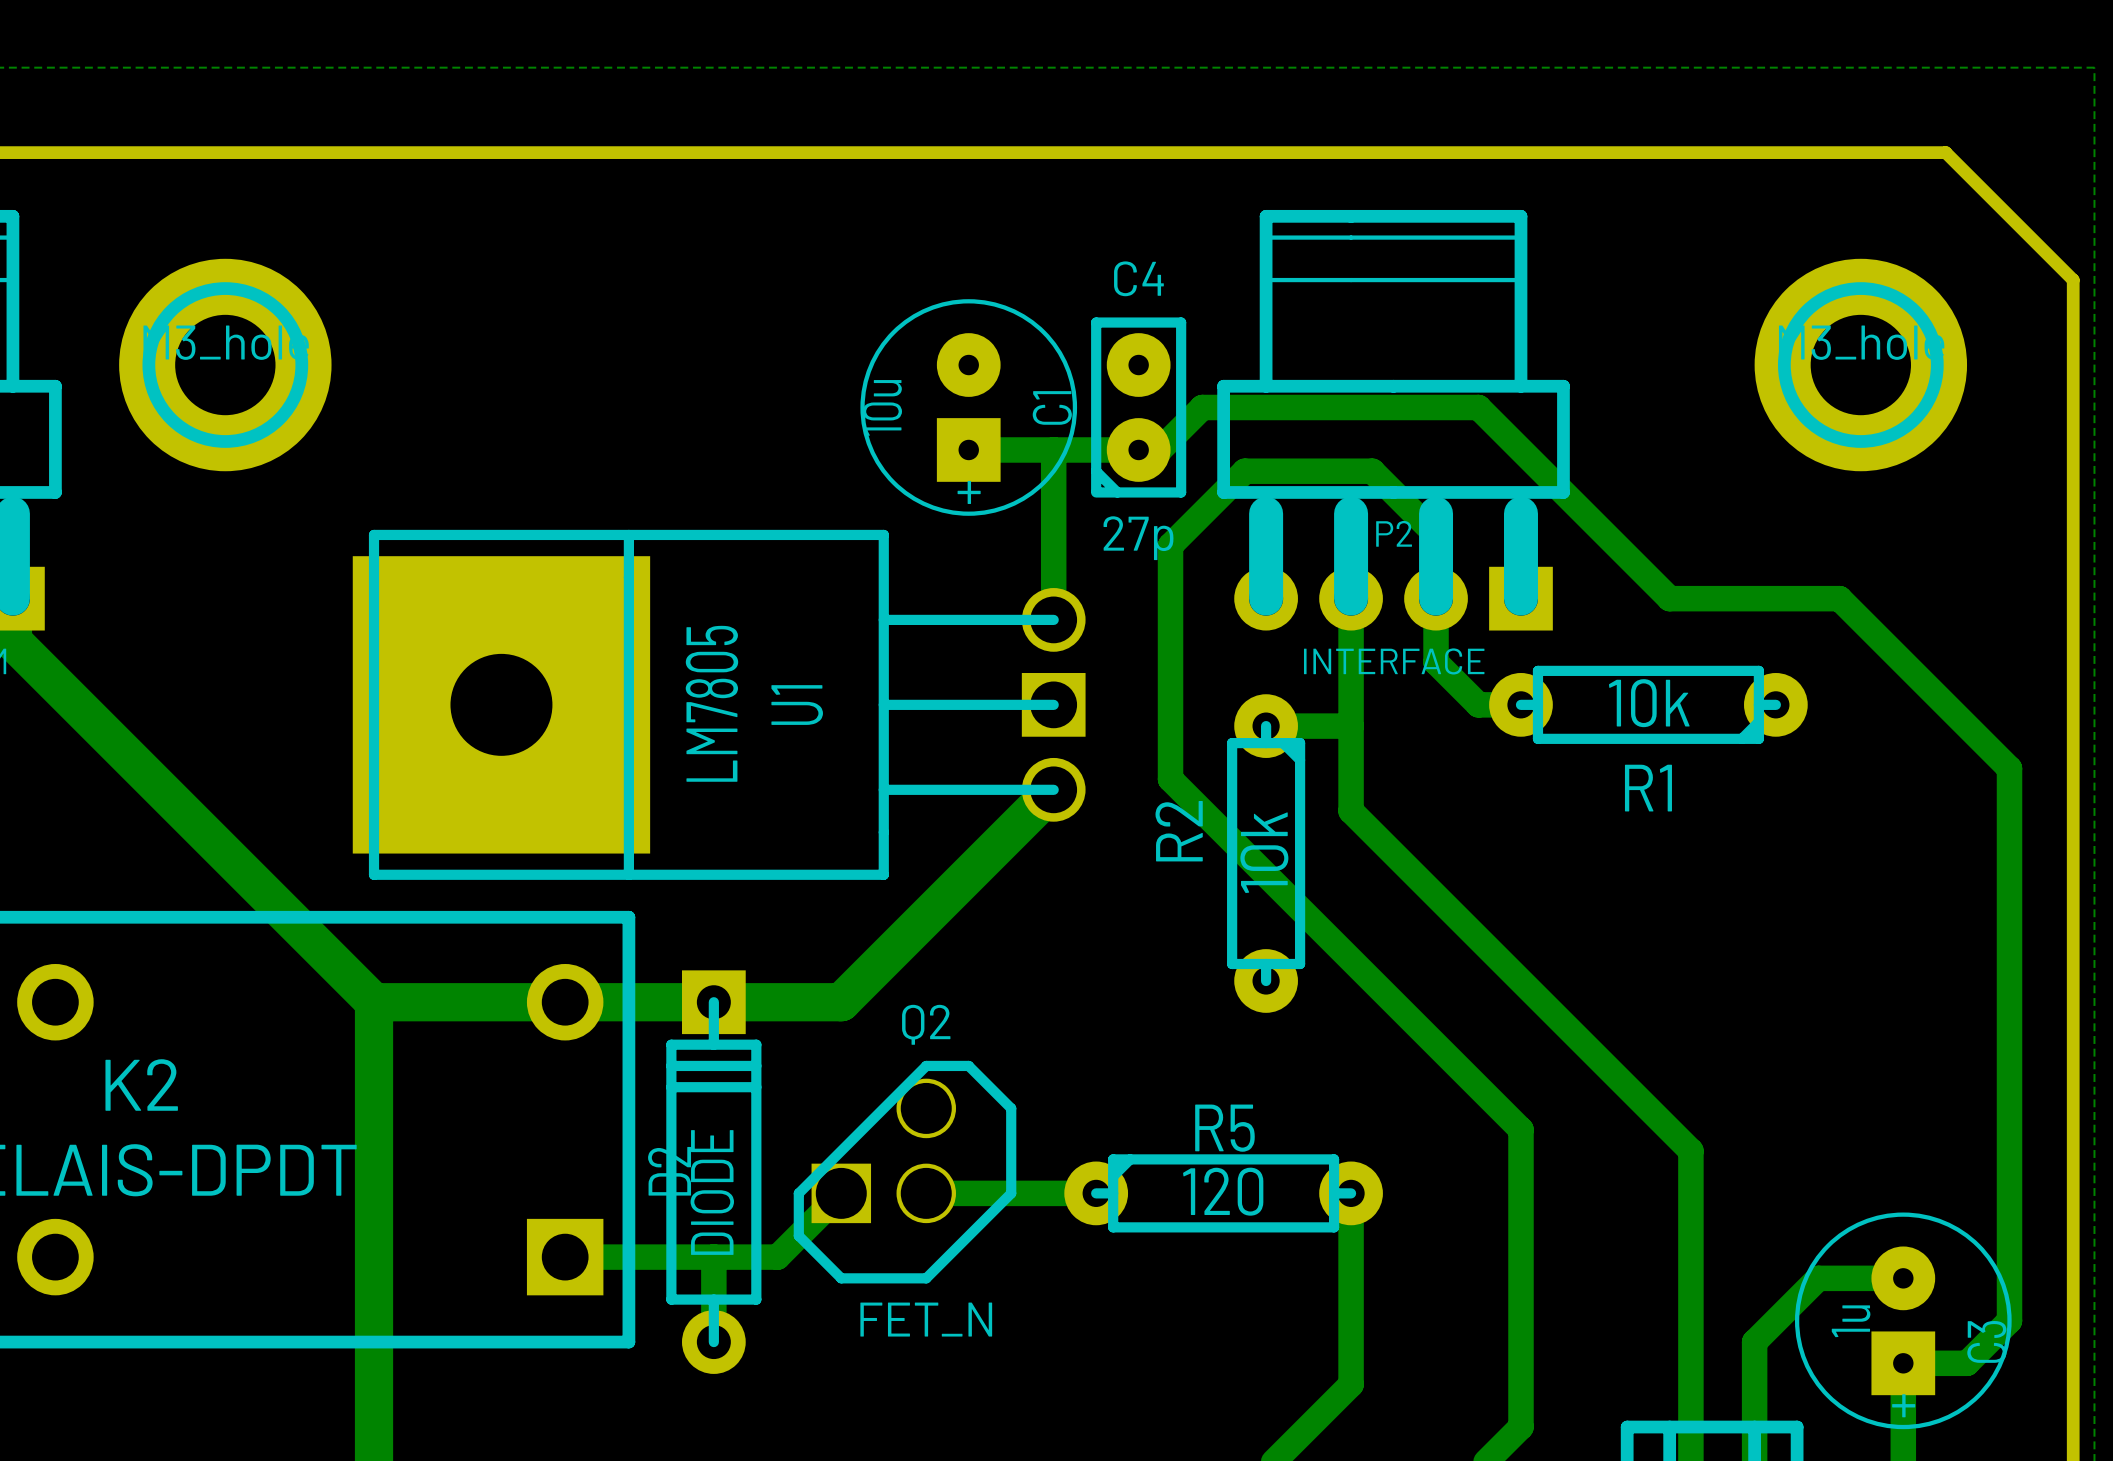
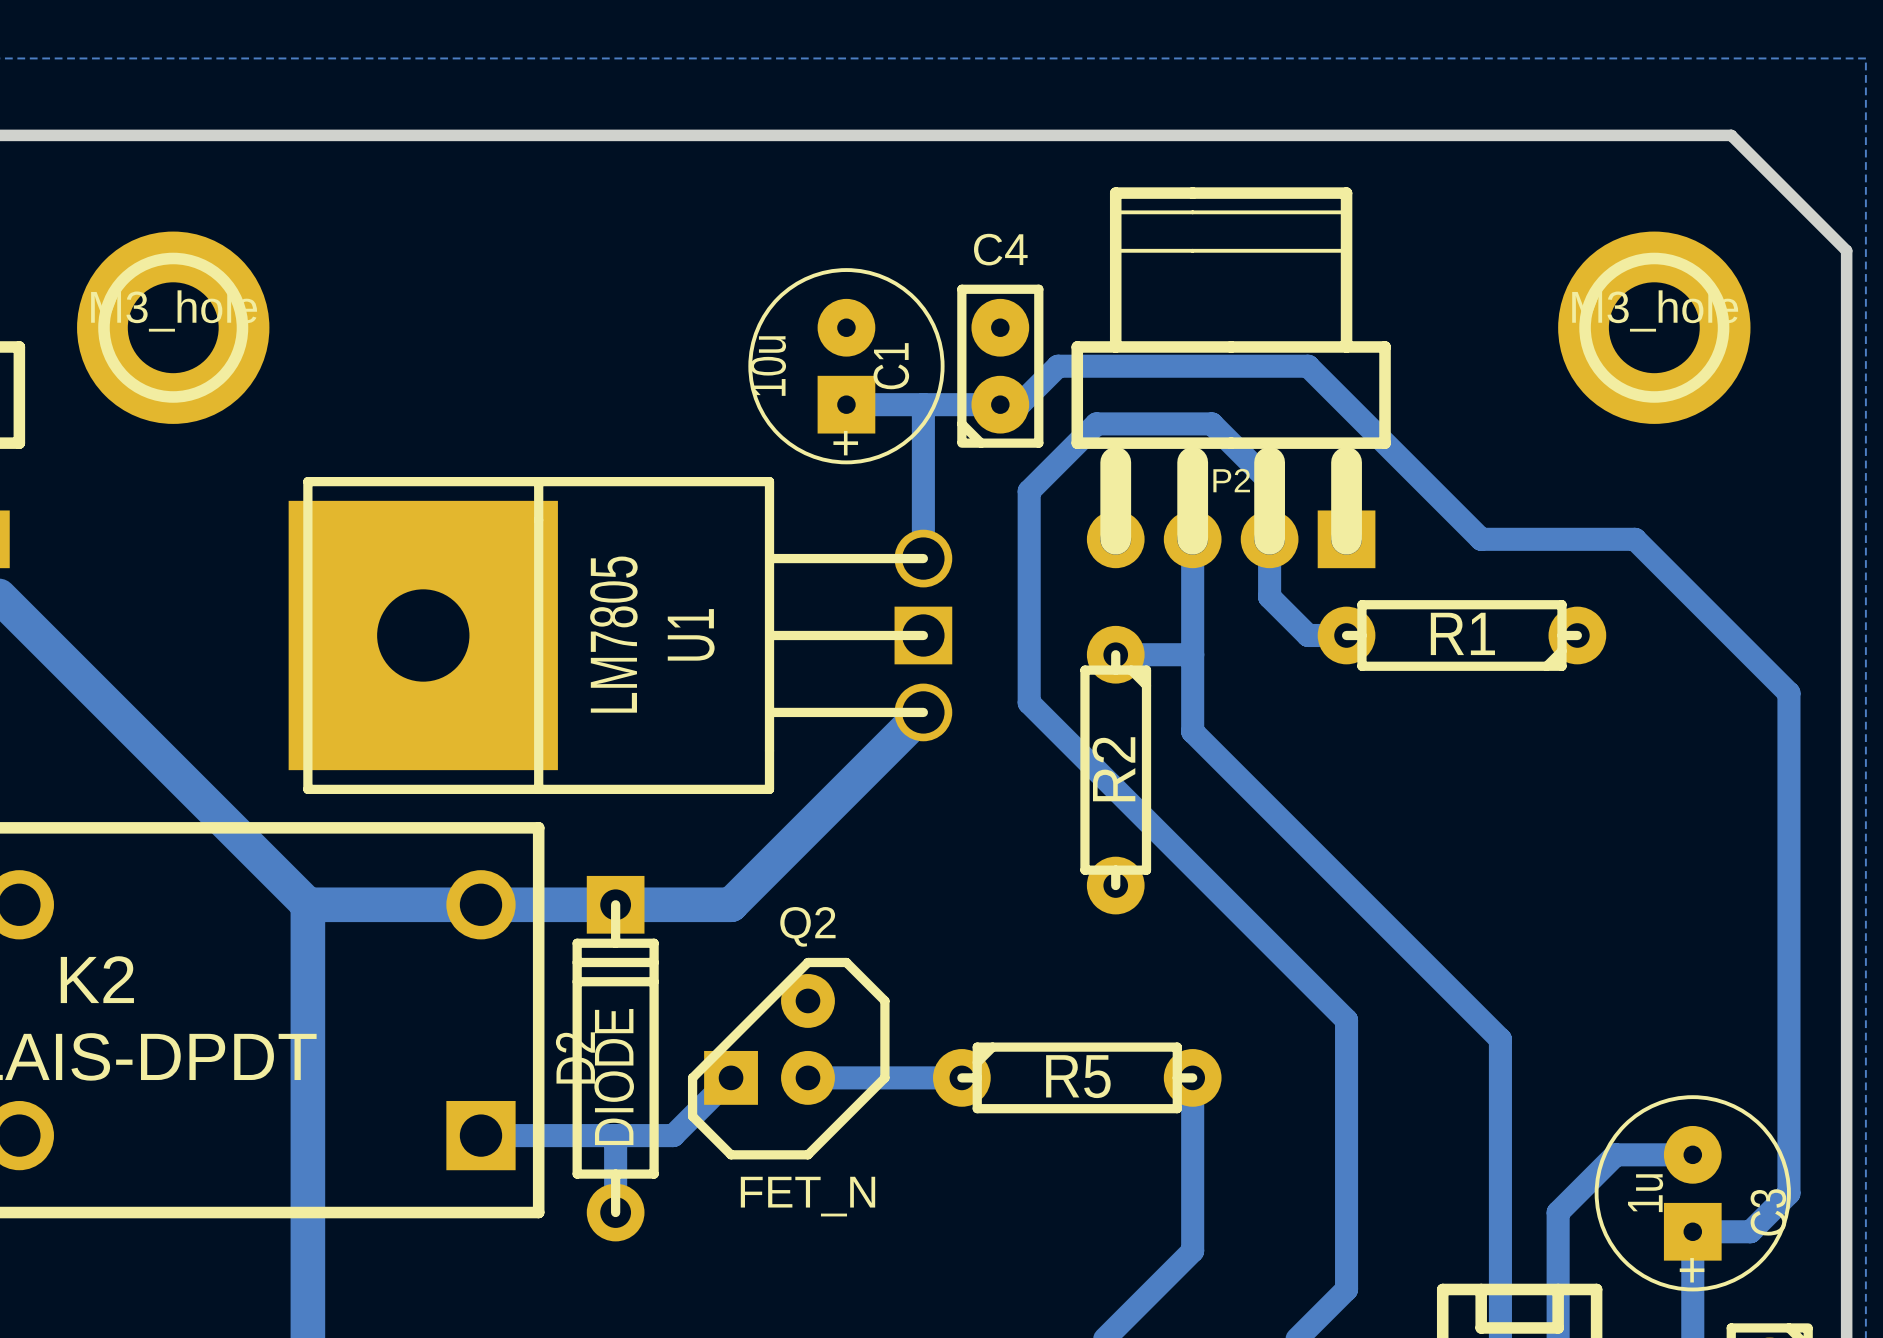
C1 name position: C1 (1052, 407) -> C1 (891, 366)
C4 value: 27p (1138, 538) -> none
P2 value: INTERFACE (1394, 661) -> none
R1 value: 10k (1649, 703) -> none
R1 name position: R1 (1648, 788) -> R1 (1462, 633)
R2 name position: R2 (1179, 831) -> R2 (1113, 769)
R2 value: 10k (1264, 852) -> none
Q2 footprint: [793, 1060, 1017, 1284] -> [687, 957, 890, 1160]
R5 name position: R5 (1224, 1128) -> R5 (1078, 1076)
R5 value: 120 (1223, 1191) -> none

